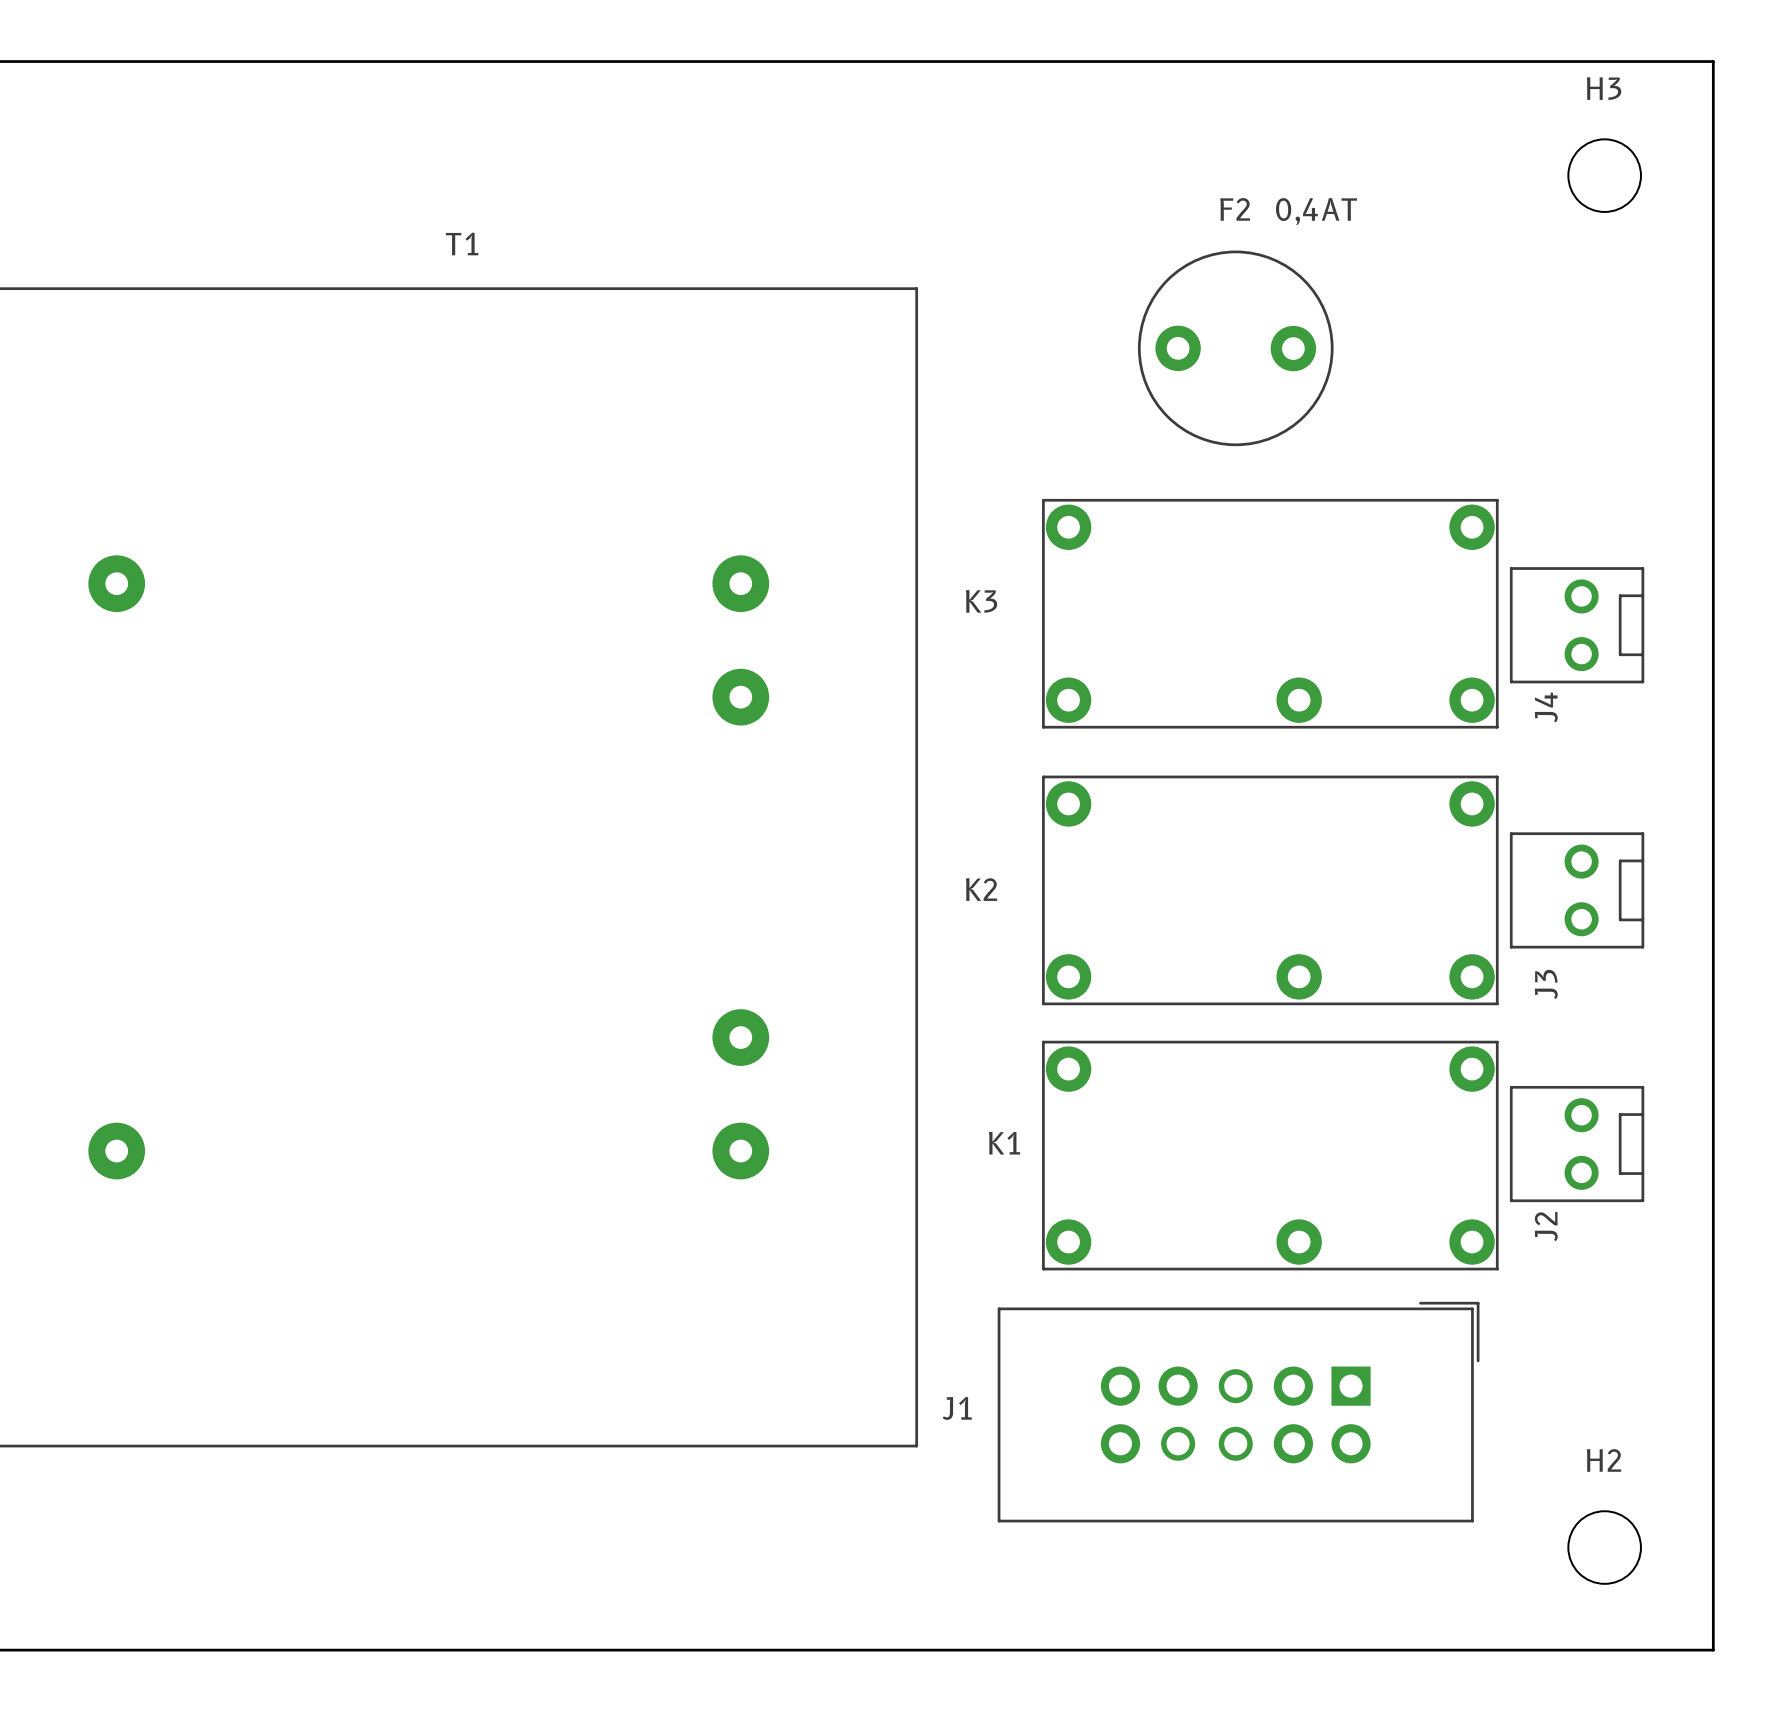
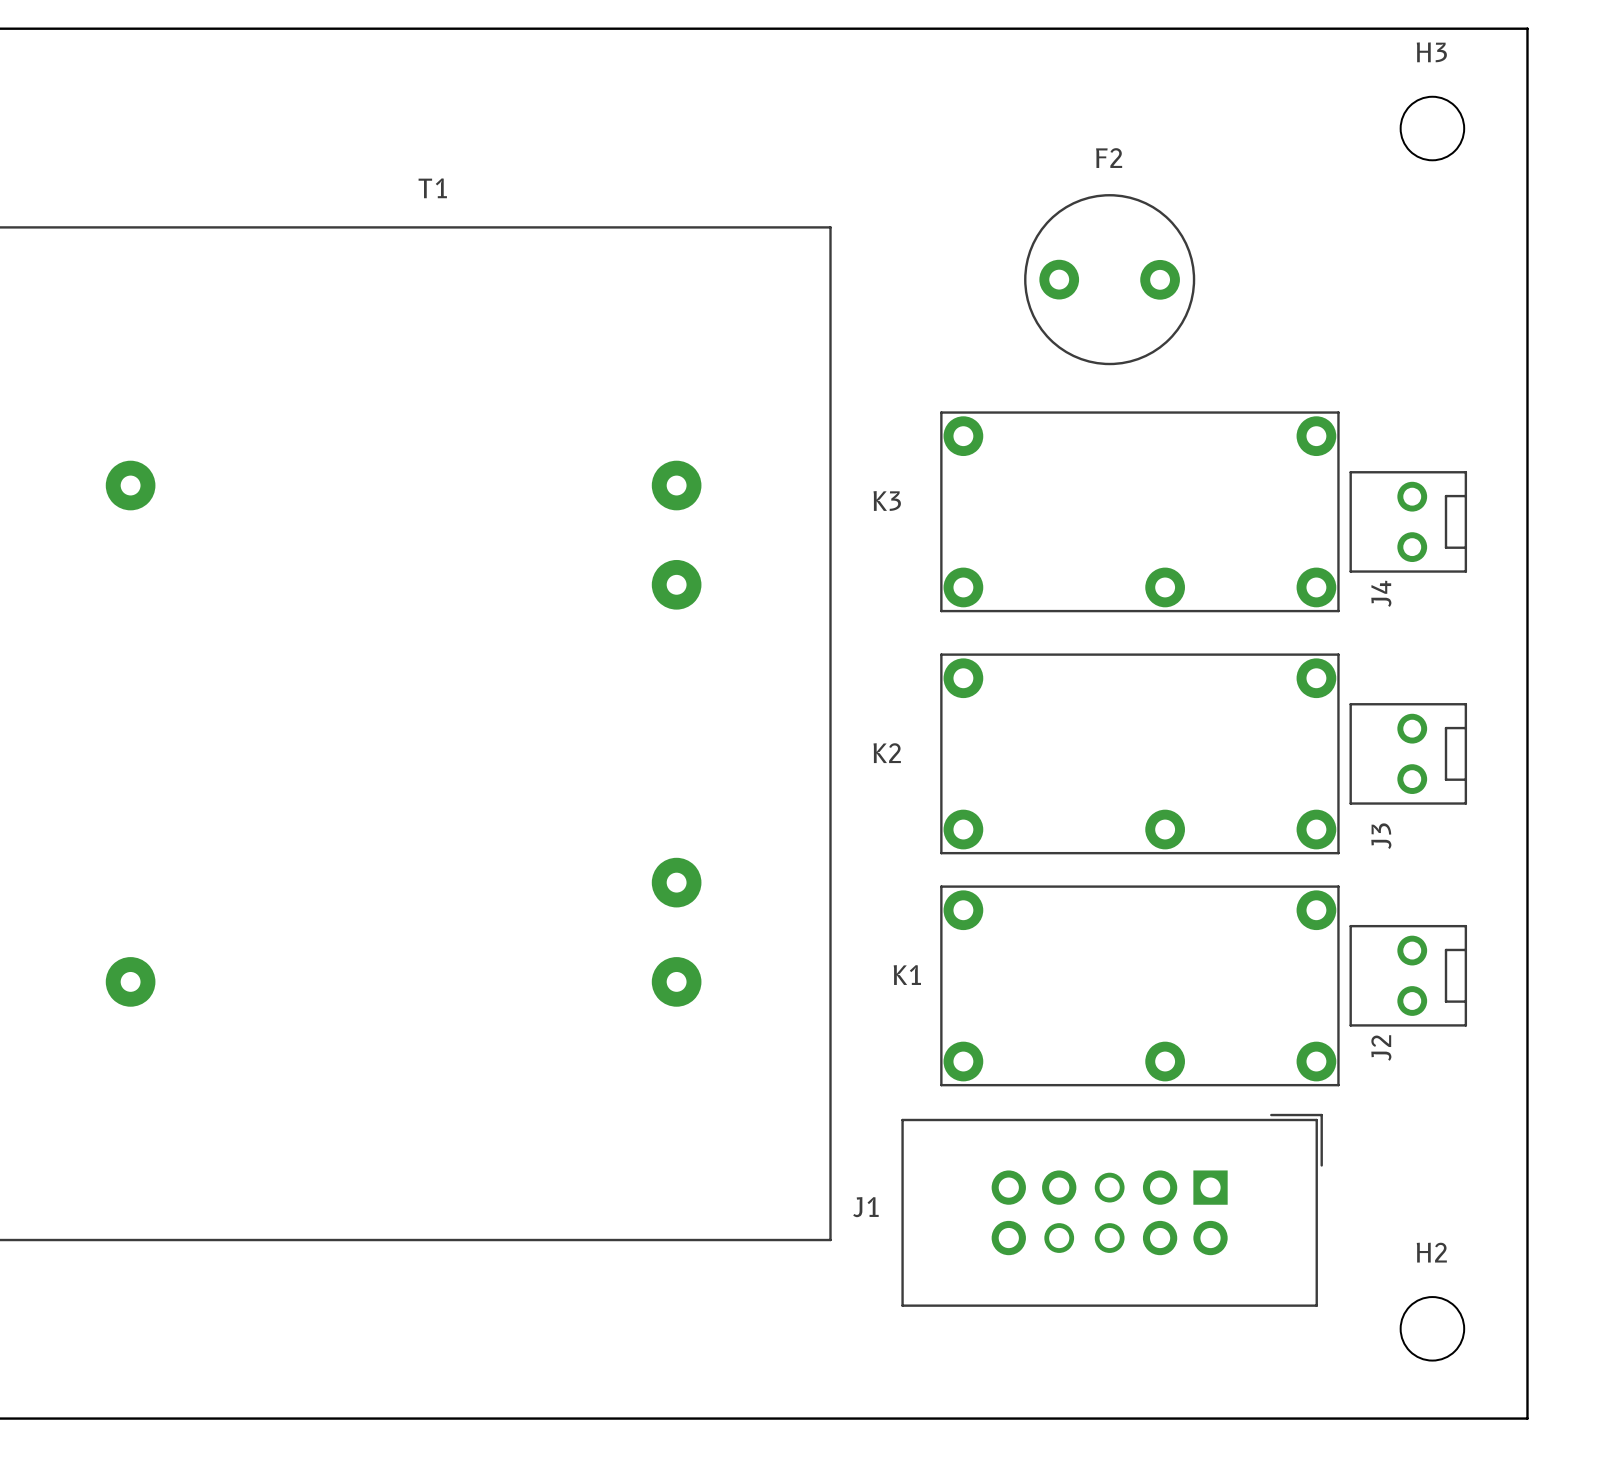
F2 value: 0,4AT (1316, 211) -> none

